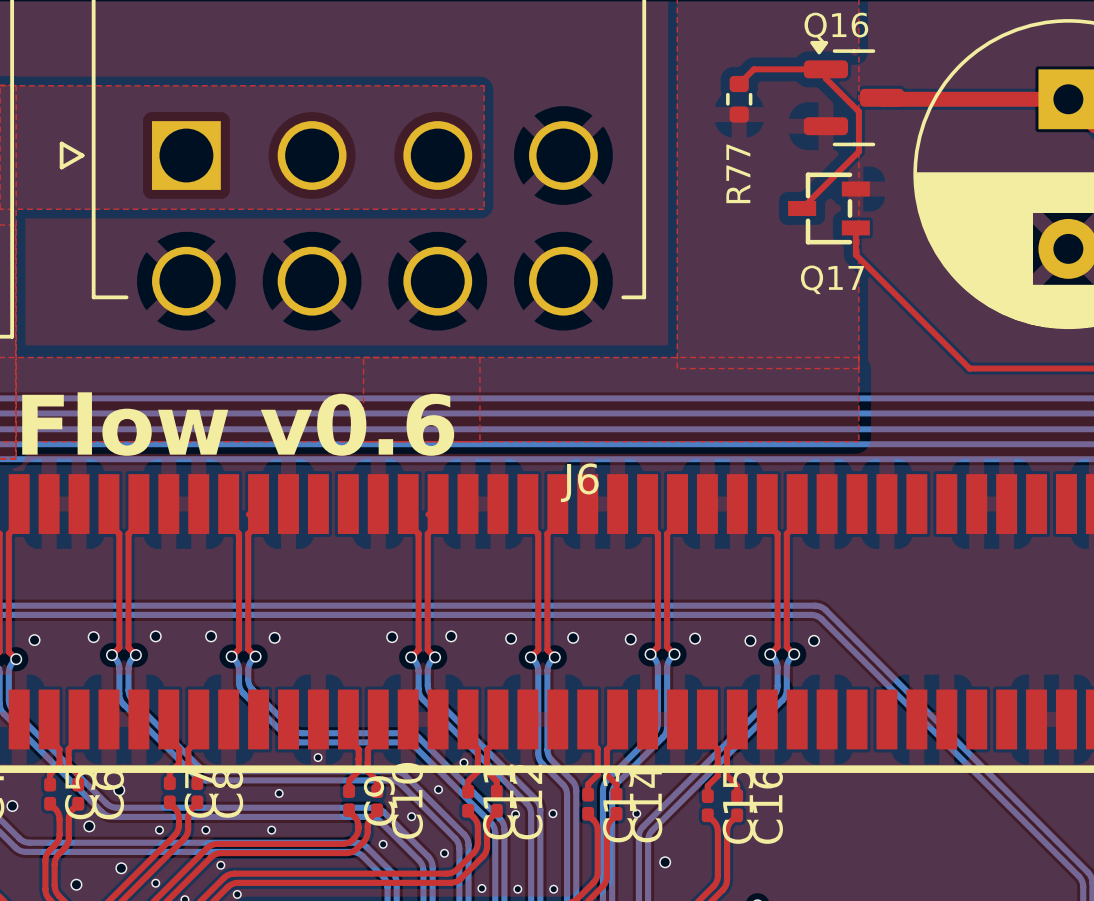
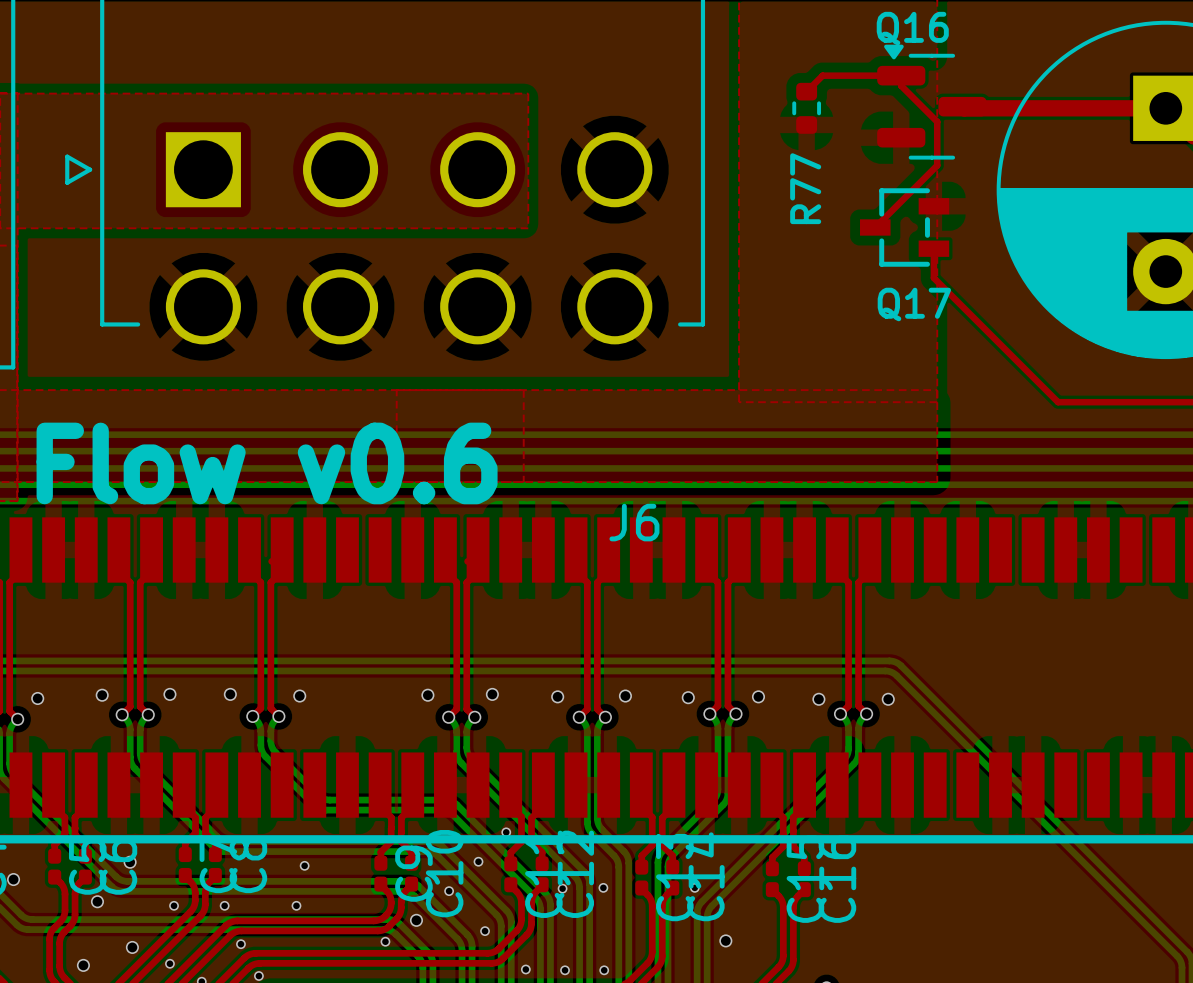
via: (318, 757) -> none
via: none -> (416, 920)
via position: (383, 844) -> (385, 941)

